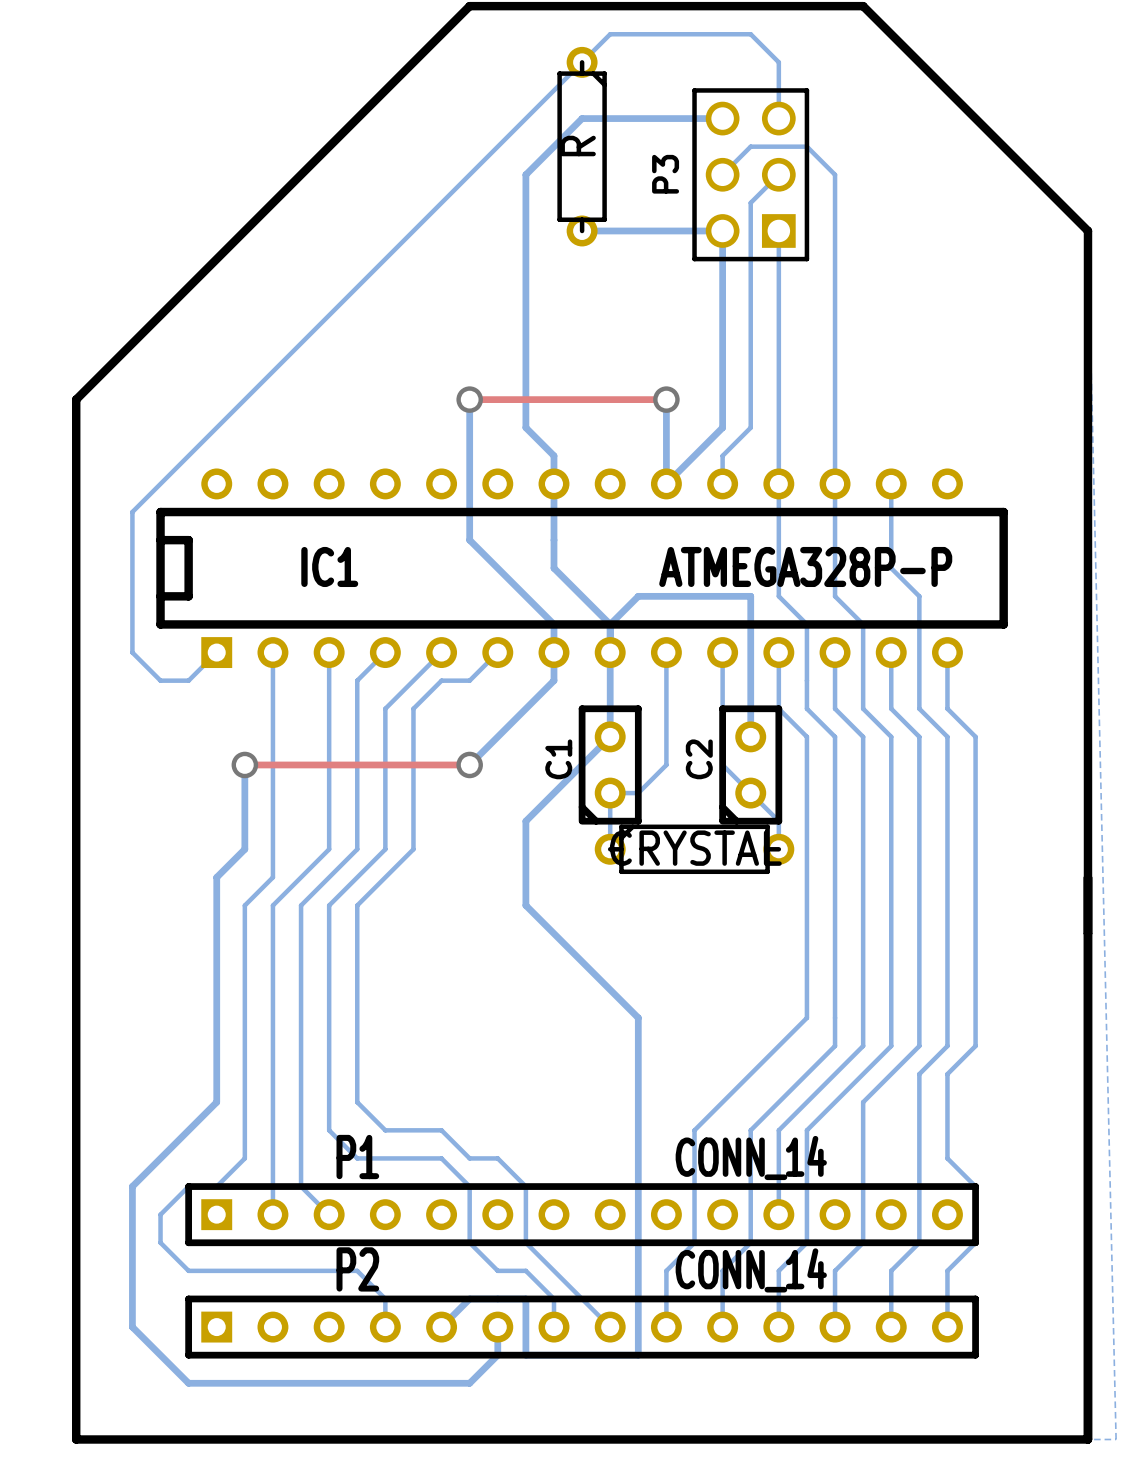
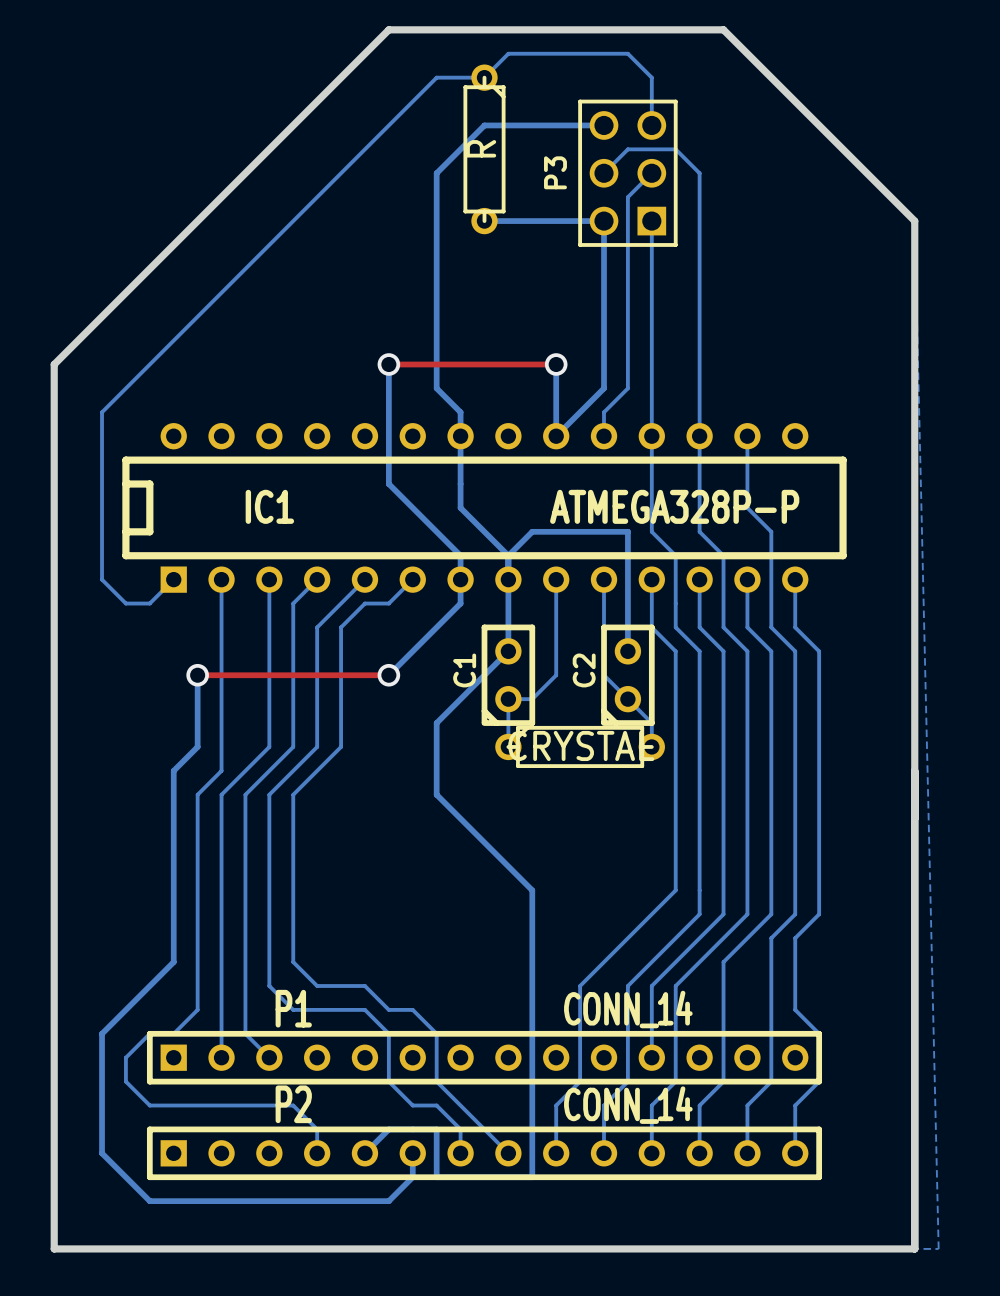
bottom track: (582, 62) (132, 512) -> (484, 77) (436, 77) (102, 412) (102, 460)

